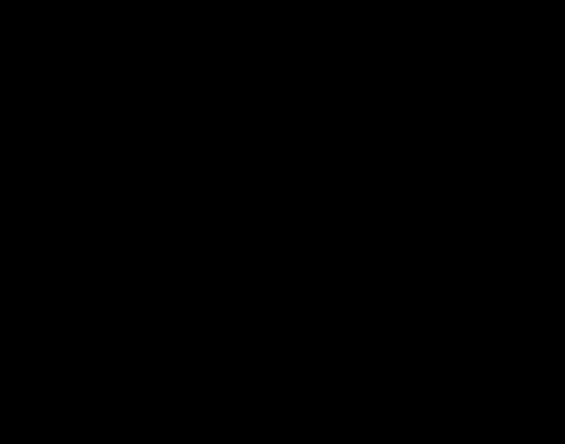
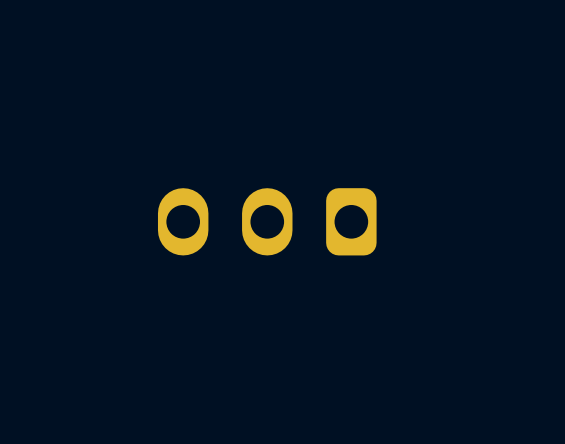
part: none -> (267, 221)

